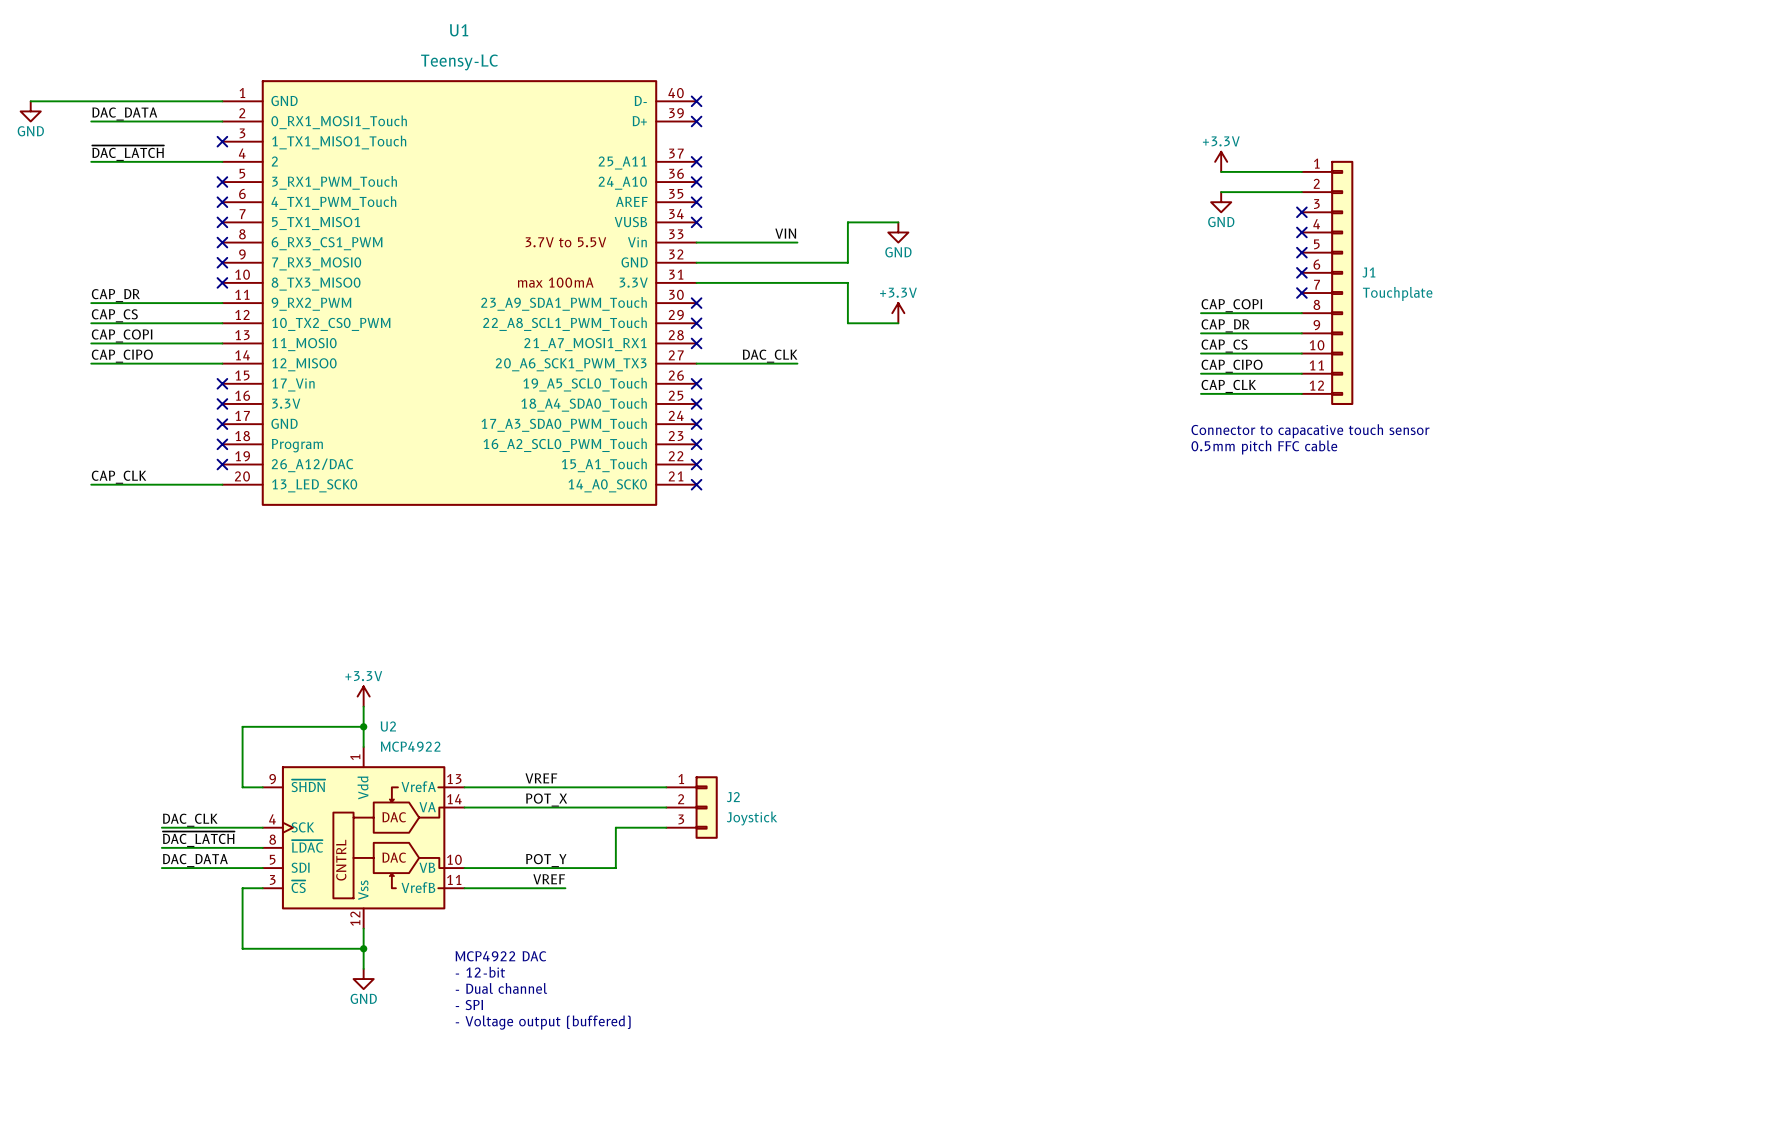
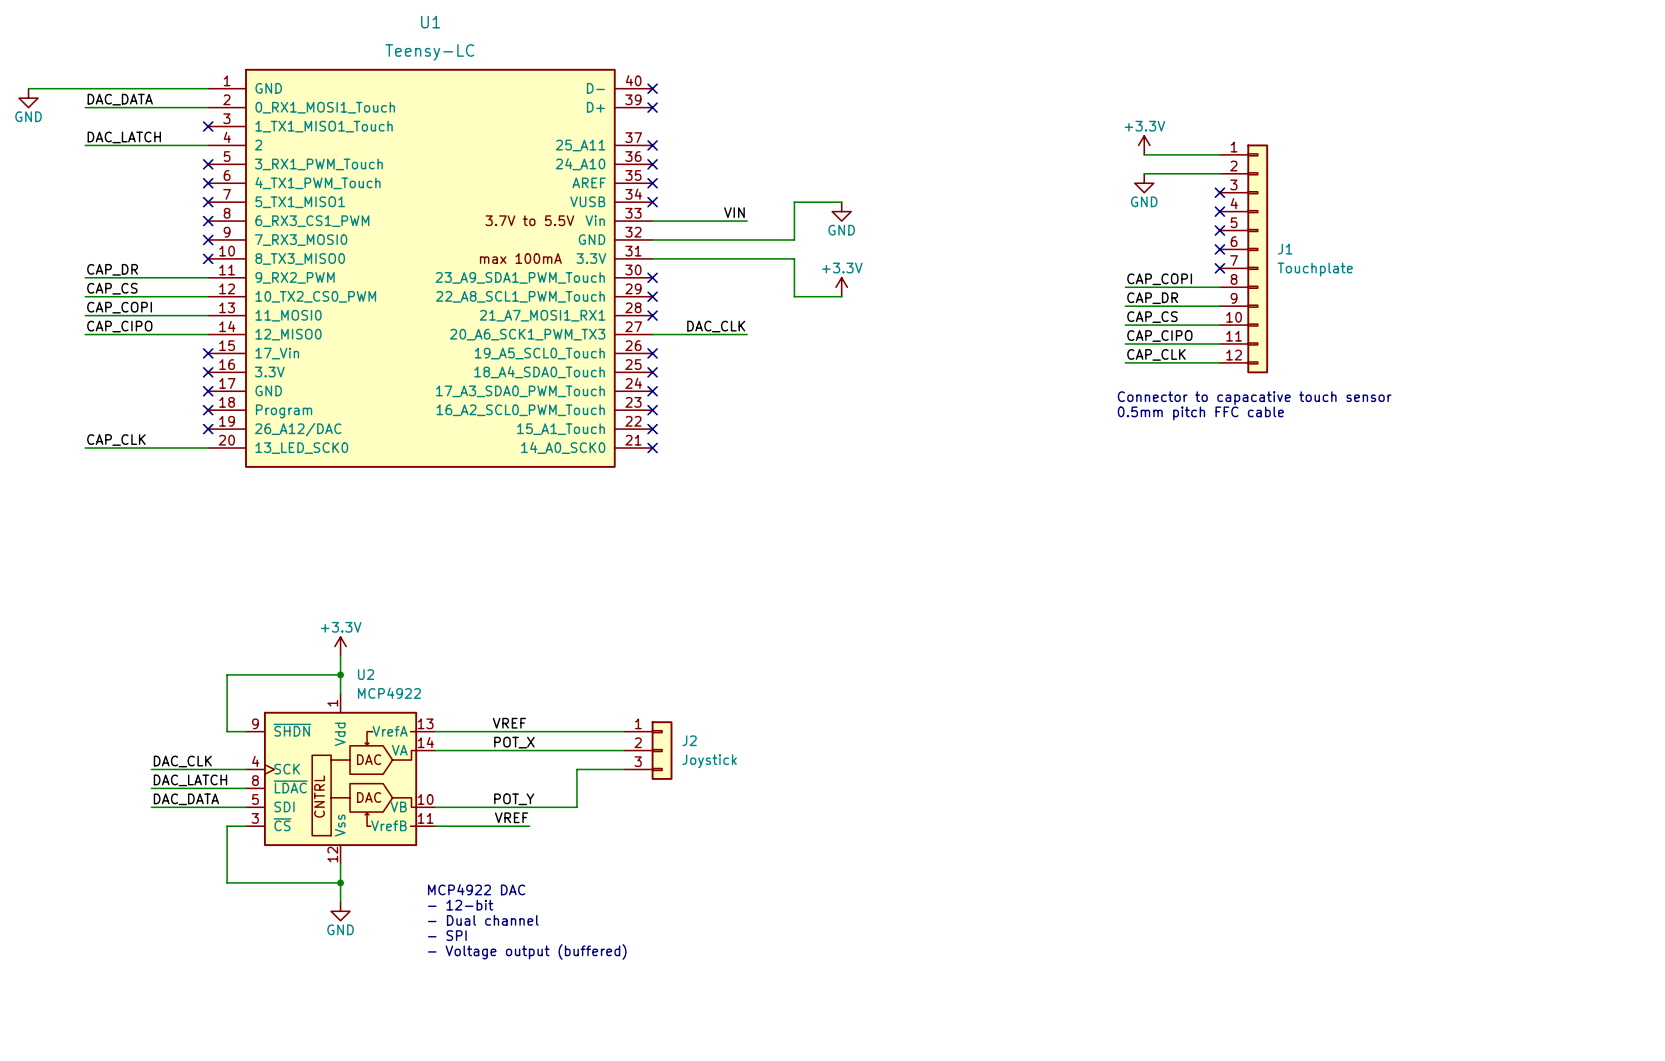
label: ~{DAC_LATCH} (128, 153) -> DAC_LATCH (124, 137)
label: ~{DAC_LATCH} (198, 839) -> DAC_LATCH (190, 780)

